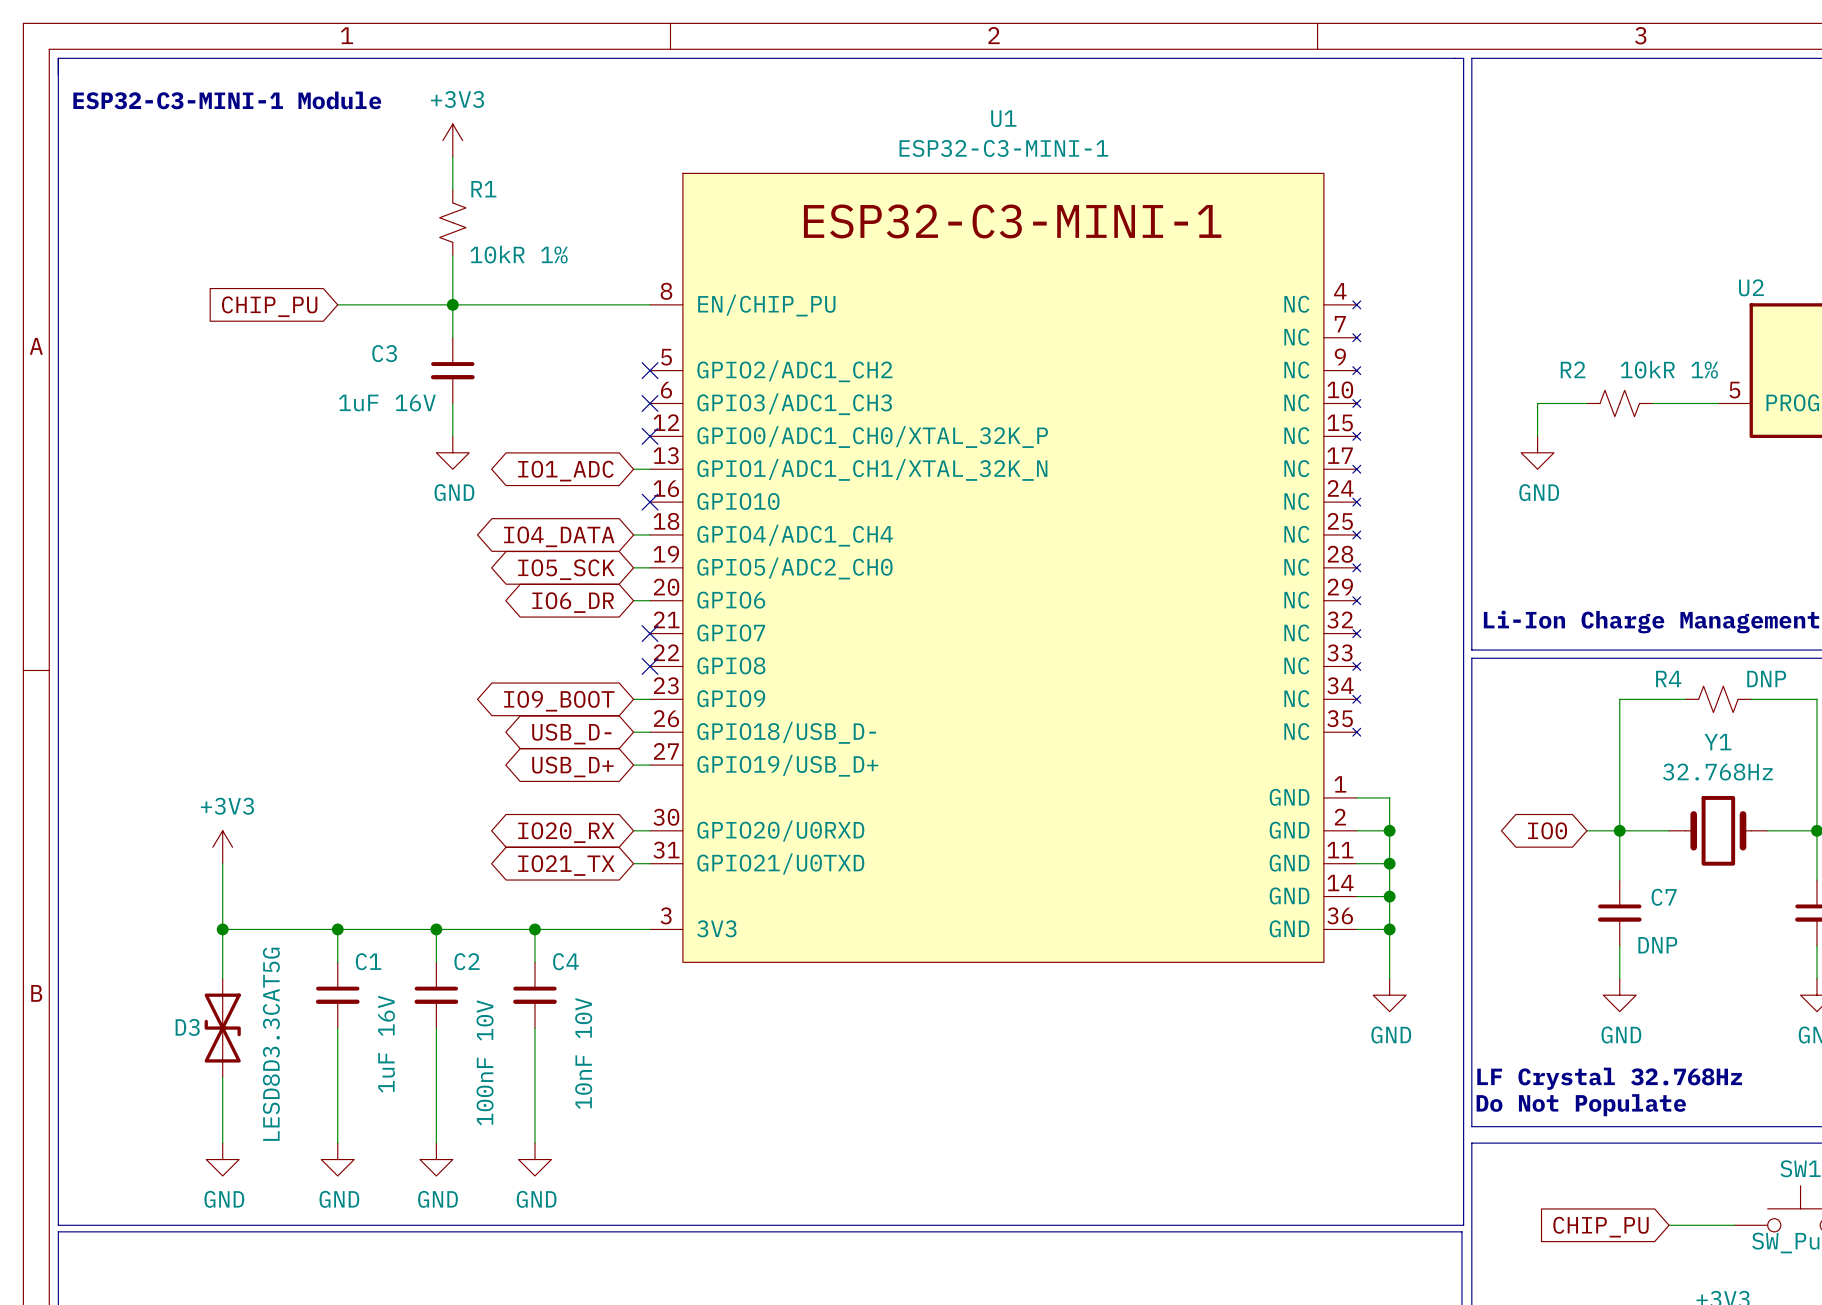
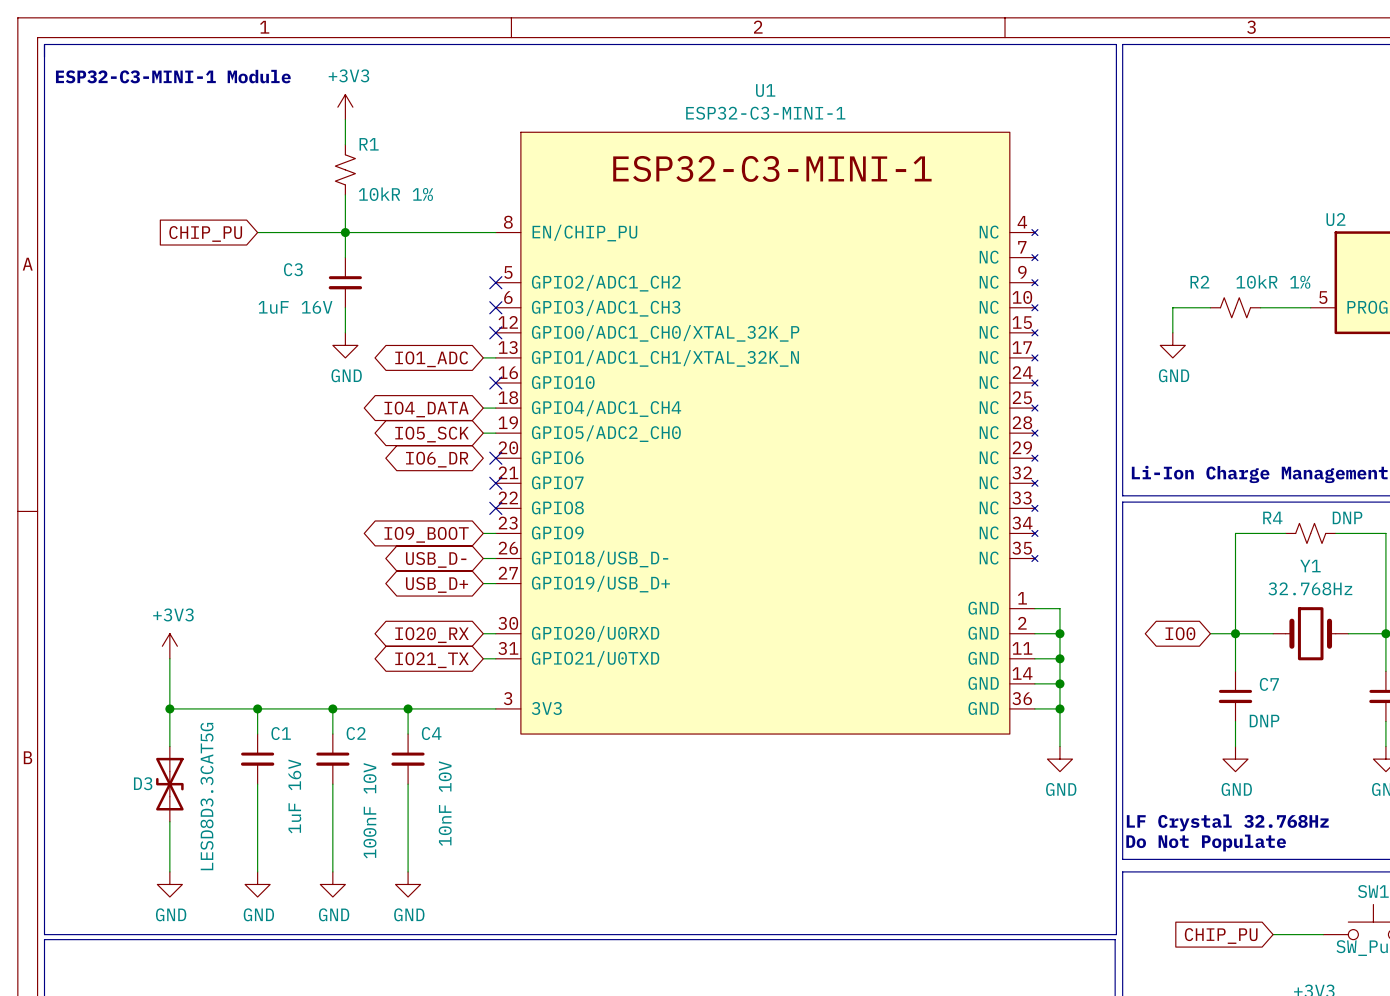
wire: (633, 600) (650, 600) -> none
no-connect mark: none -> (495, 458)

